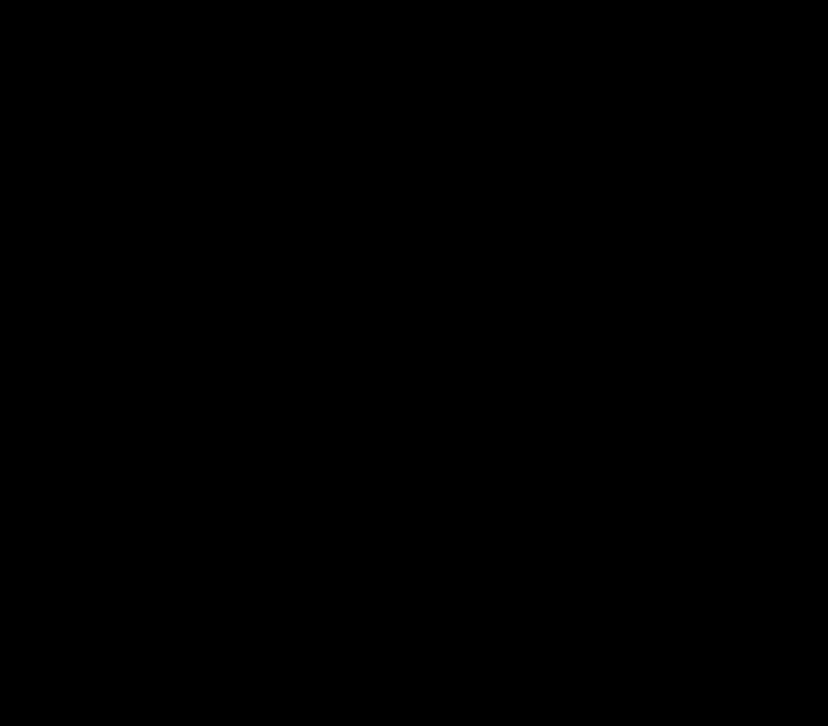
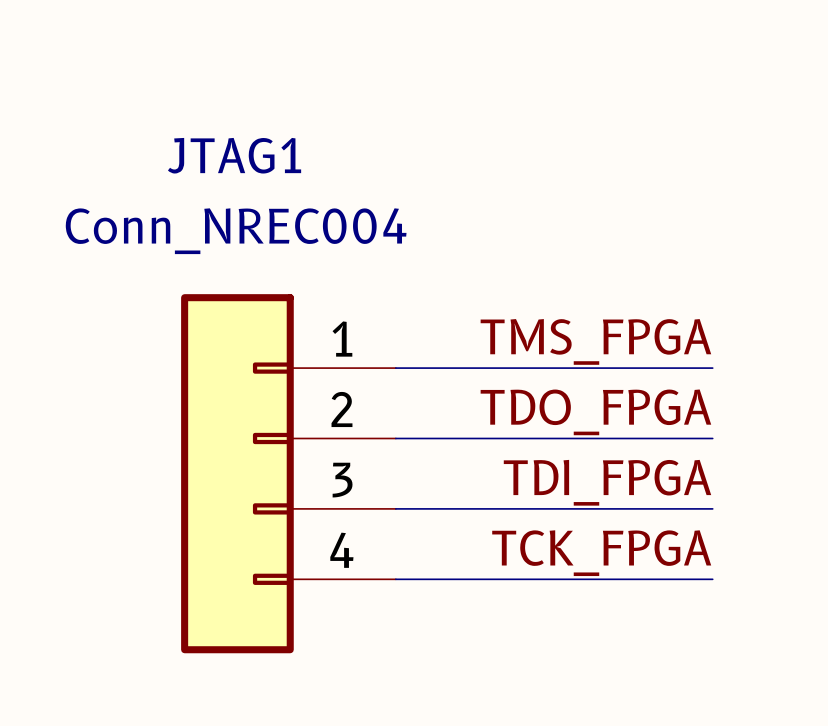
label: none -> TMS_FPGA (595, 341)
wire: none -> (395, 368) (712, 368)
label: none -> TDO_FPGA (595, 412)
wire: none -> (395, 438) (712, 438)
JTAG1: none -> Conn_NREC004 (288, 473)
label: none -> TDI_FPGA (607, 482)
wire: none -> (395, 508) (712, 508)
label: none -> TCK_FPGA (601, 553)
wire: none -> (395, 579) (712, 579)

